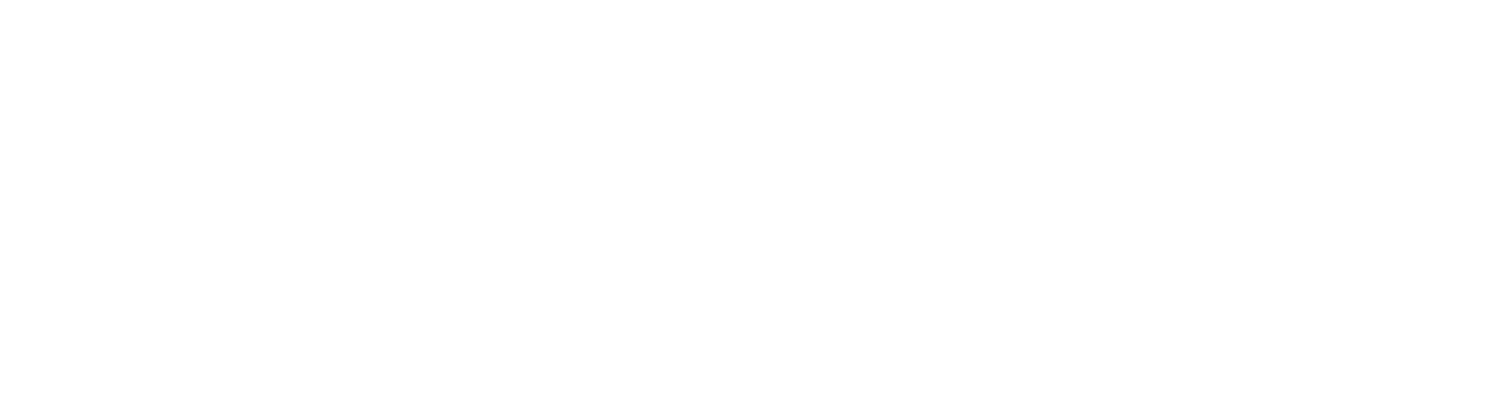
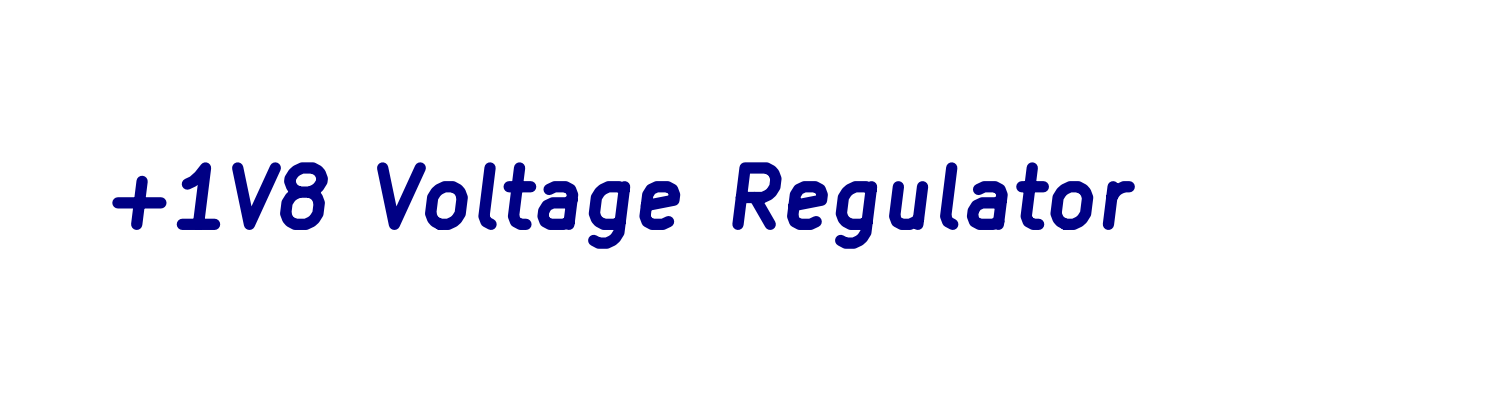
text: none -> +1V8 Voltage Regulator (623, 205)

